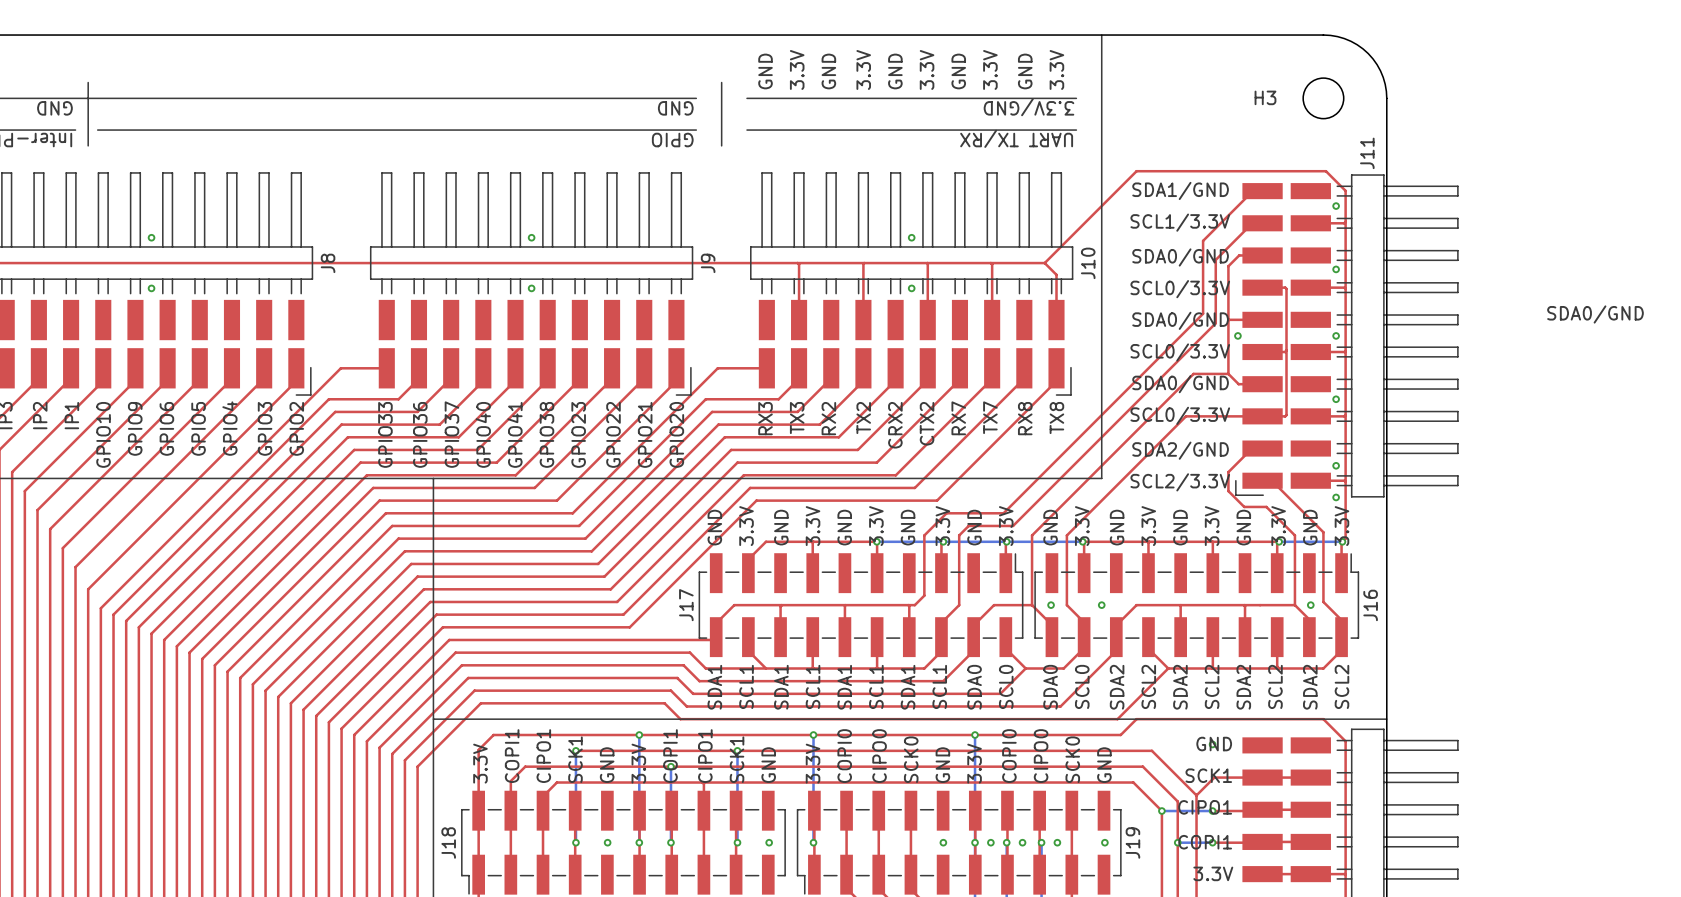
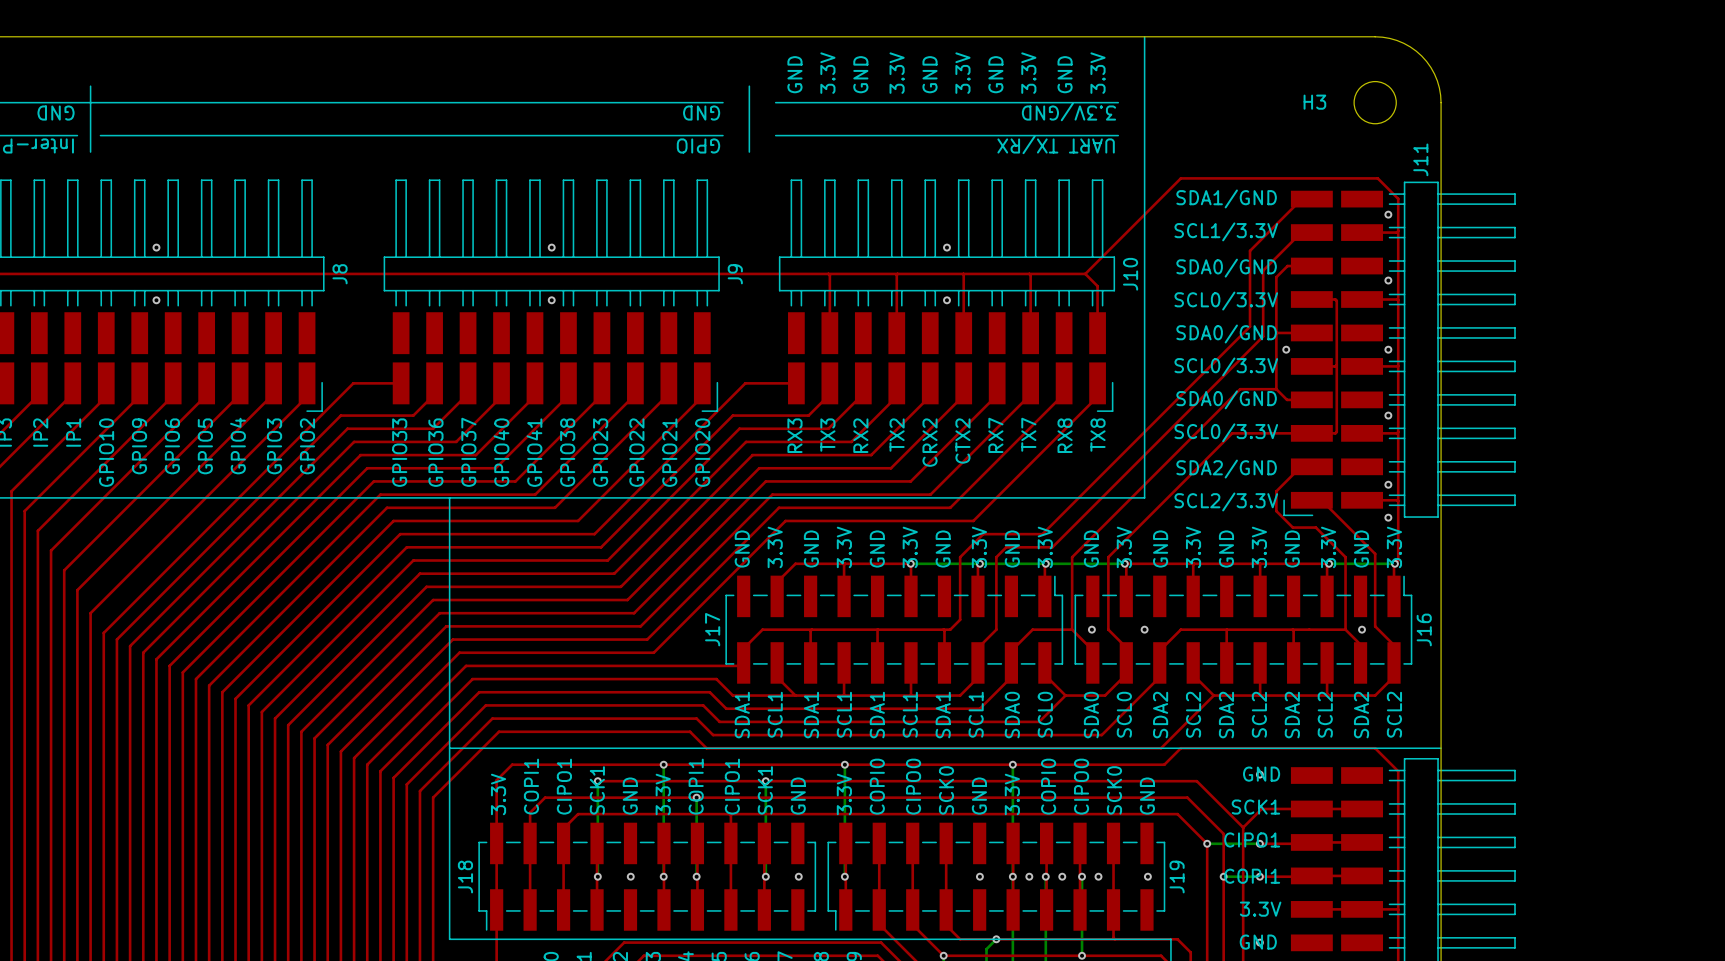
text: SDA0/GND (1595, 314) -> none

